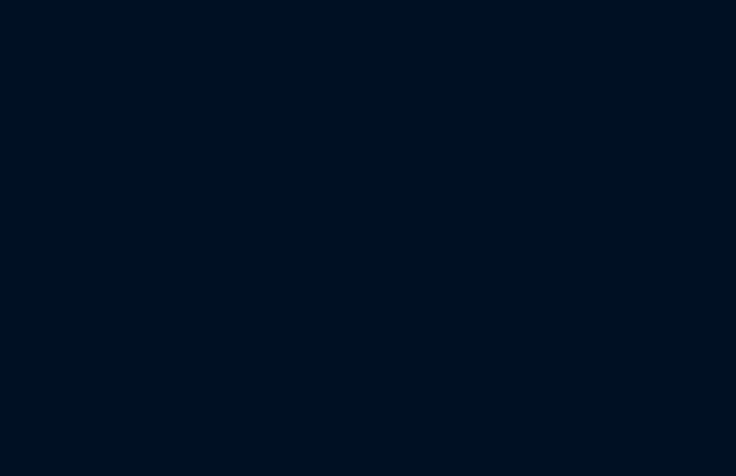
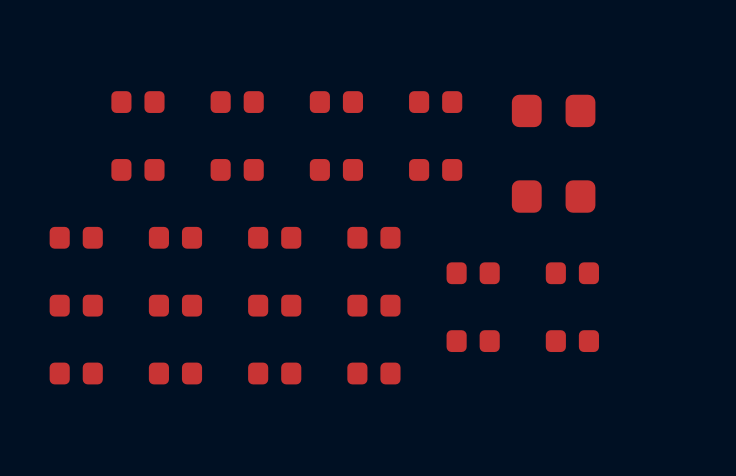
part: none -> (137, 102)
part: none -> (237, 102)
part: none -> (336, 102)
part: none -> (435, 102)
part: none -> (553, 110)
part: none -> (137, 169)
part: none -> (237, 169)
part: none -> (336, 169)
part: none -> (435, 169)
part: none -> (553, 196)
part: none -> (76, 237)
part: none -> (175, 237)
part: none -> (274, 237)
part: none -> (373, 237)
part: none -> (473, 273)
part: none -> (572, 273)
part: none -> (76, 305)
part: none -> (175, 305)
part: none -> (274, 305)
part: none -> (373, 305)
part: none -> (473, 341)
part: none -> (572, 341)
part: none -> (76, 373)
part: none -> (175, 373)
part: none -> (274, 373)
part: none -> (373, 373)

